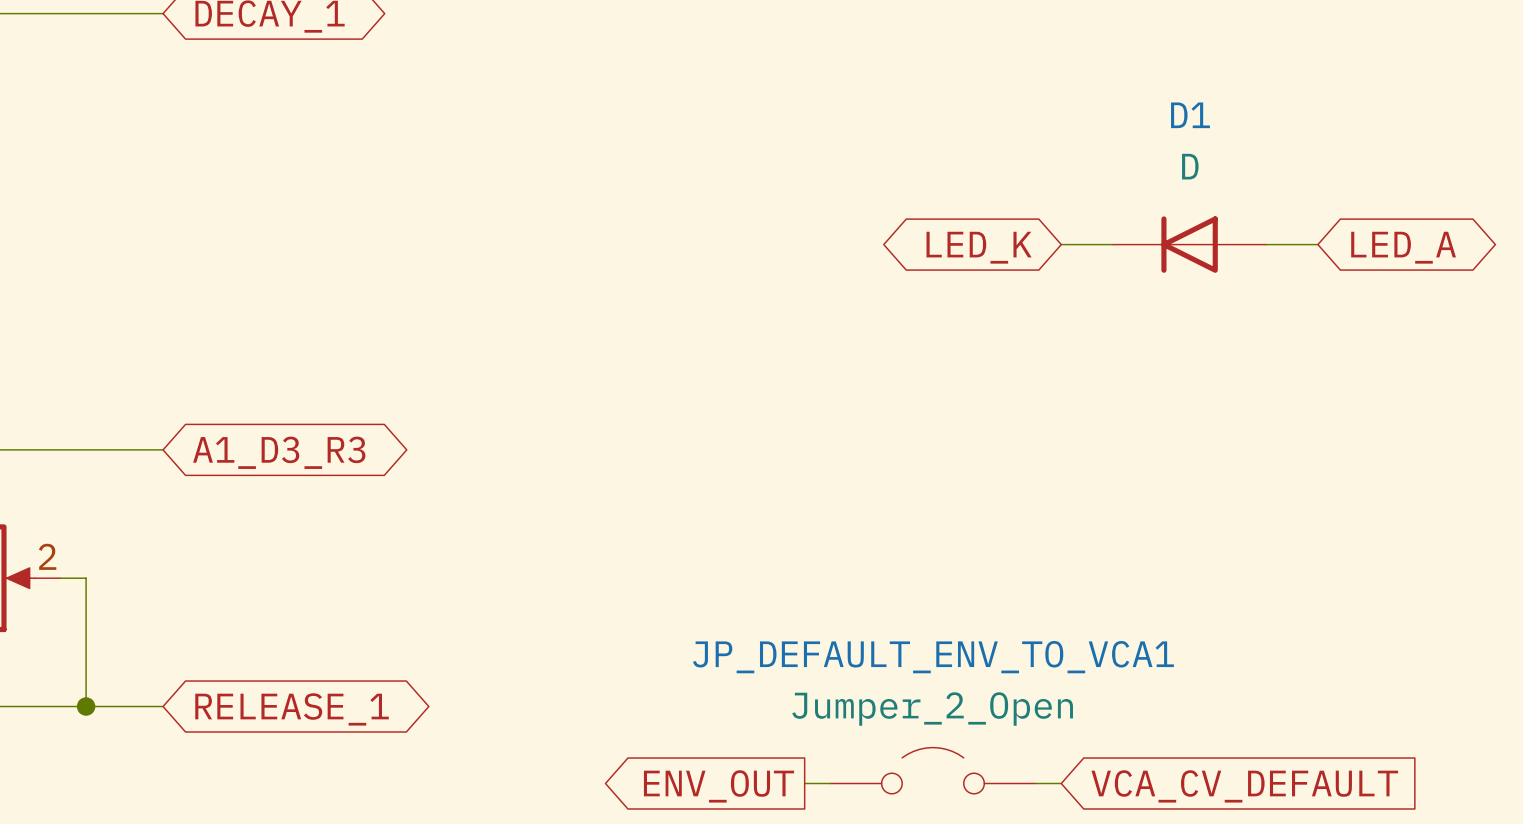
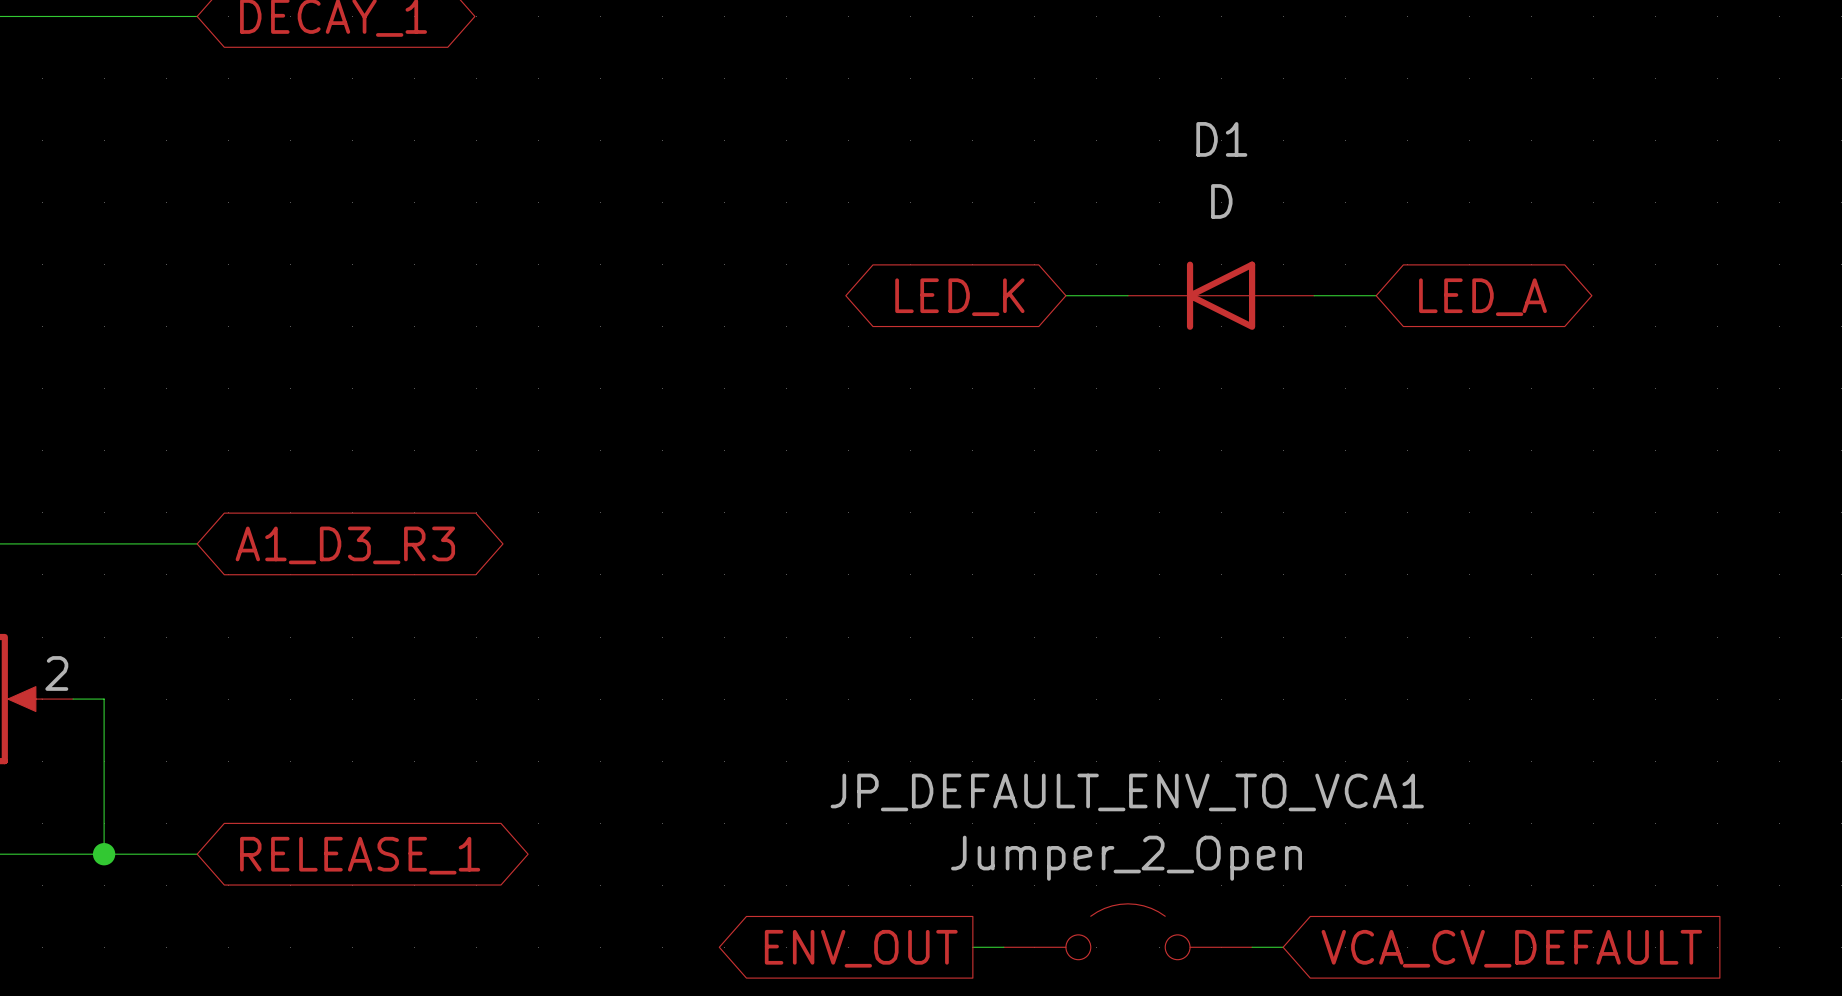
D1 position: (1189, 244) -> (1221, 295)
wire: (1266, 244) (1317, 244) -> (1065, 295) (1127, 295)
global label position: LED_K (979, 247) -> LED_K (959, 297)
global label position: LED_A (1403, 247) -> LED_A (1483, 297)

